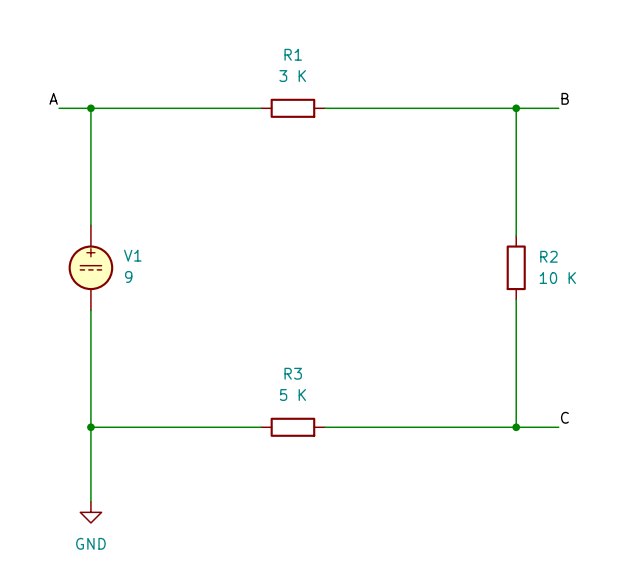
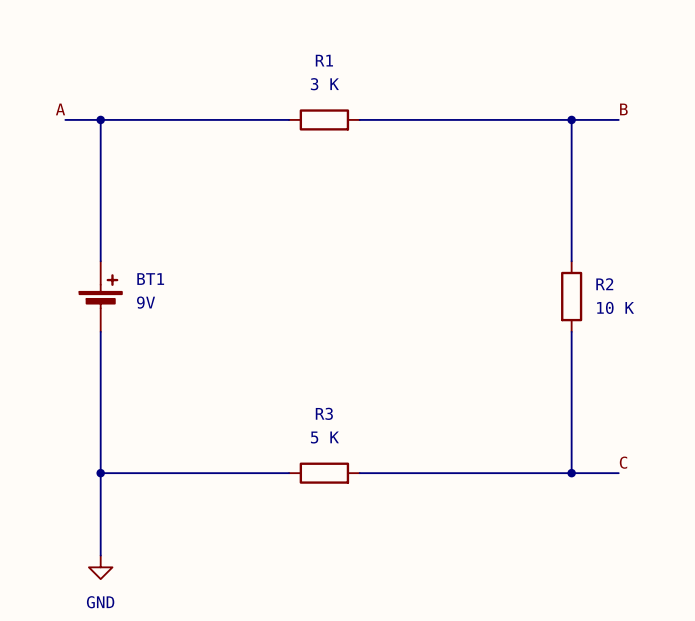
V1: 9 (90, 267) -> none
BT1: none -> 9V (100, 296)

